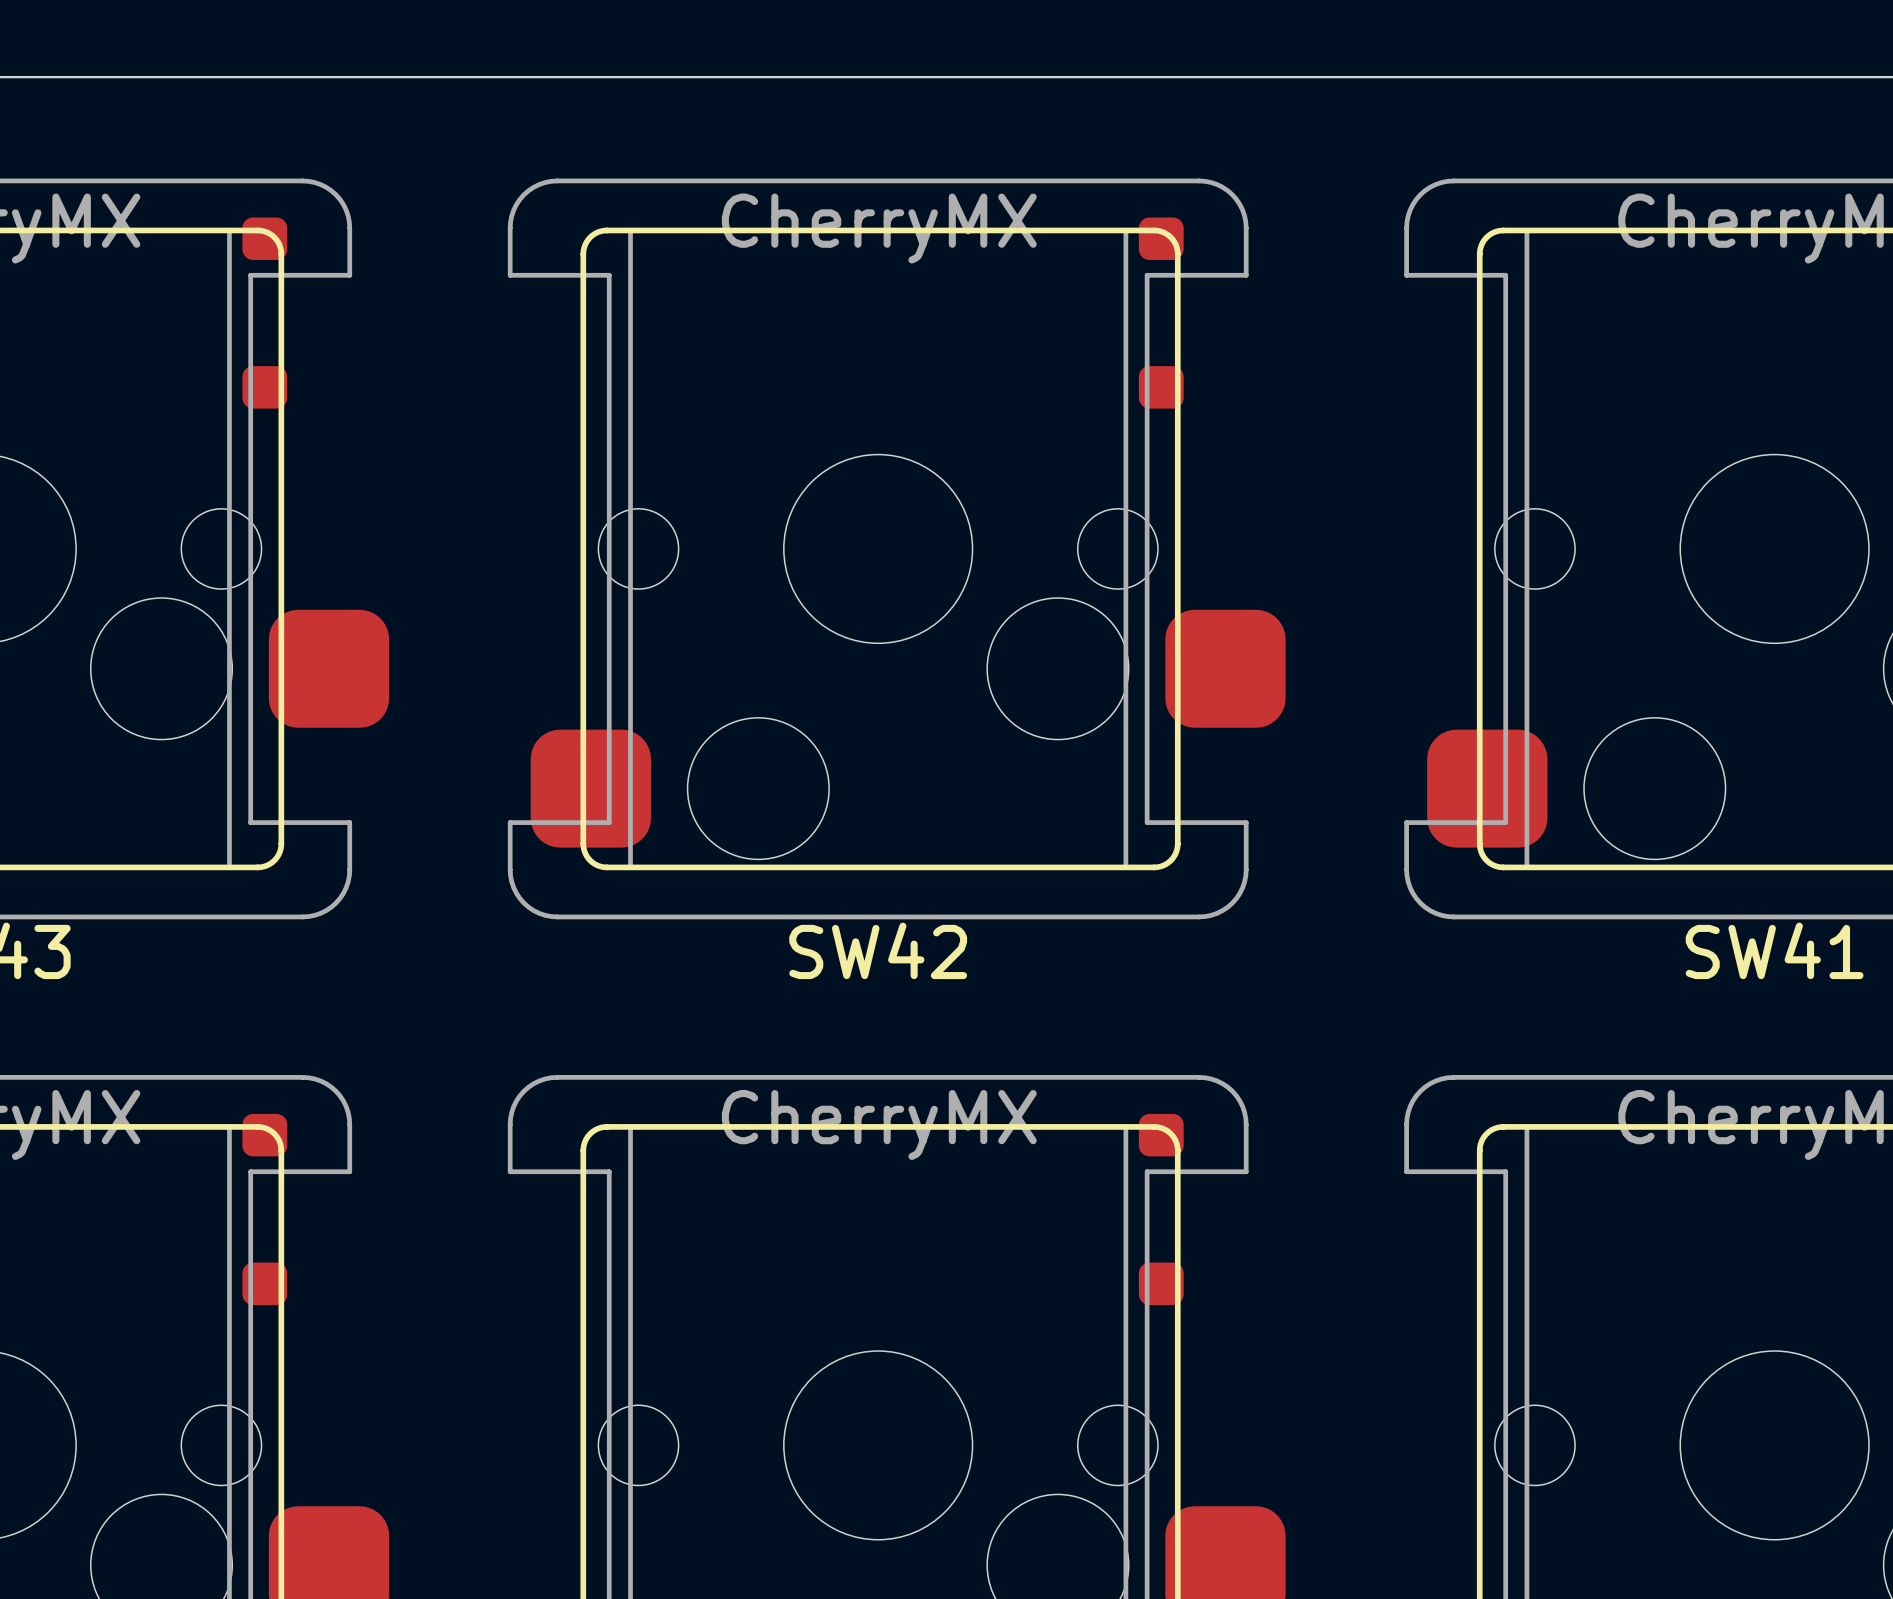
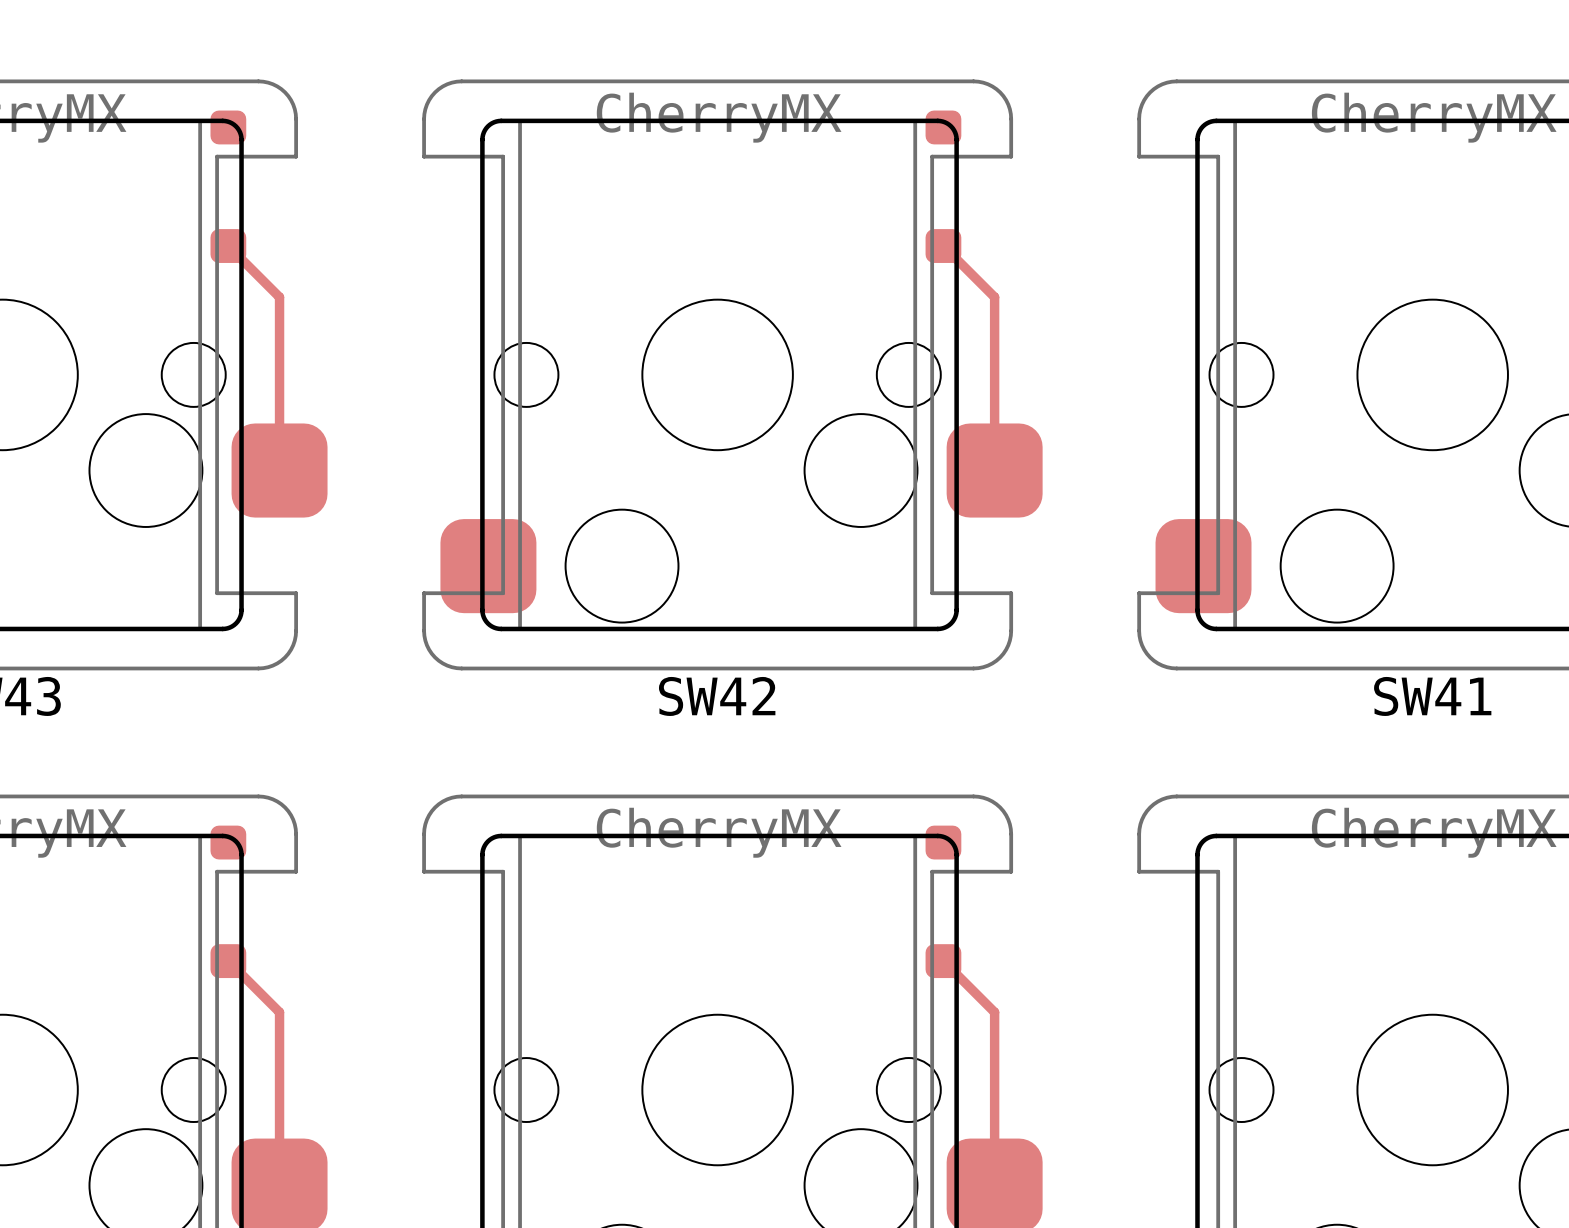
top track: none -> (228, 246) (279, 297) (279, 470)
top track: none -> (943, 246) (994, 297) (994, 470)
top track: none -> (228, 961) (279, 1012) (279, 1185)
top track: none -> (943, 961) (994, 1012) (994, 1185)

